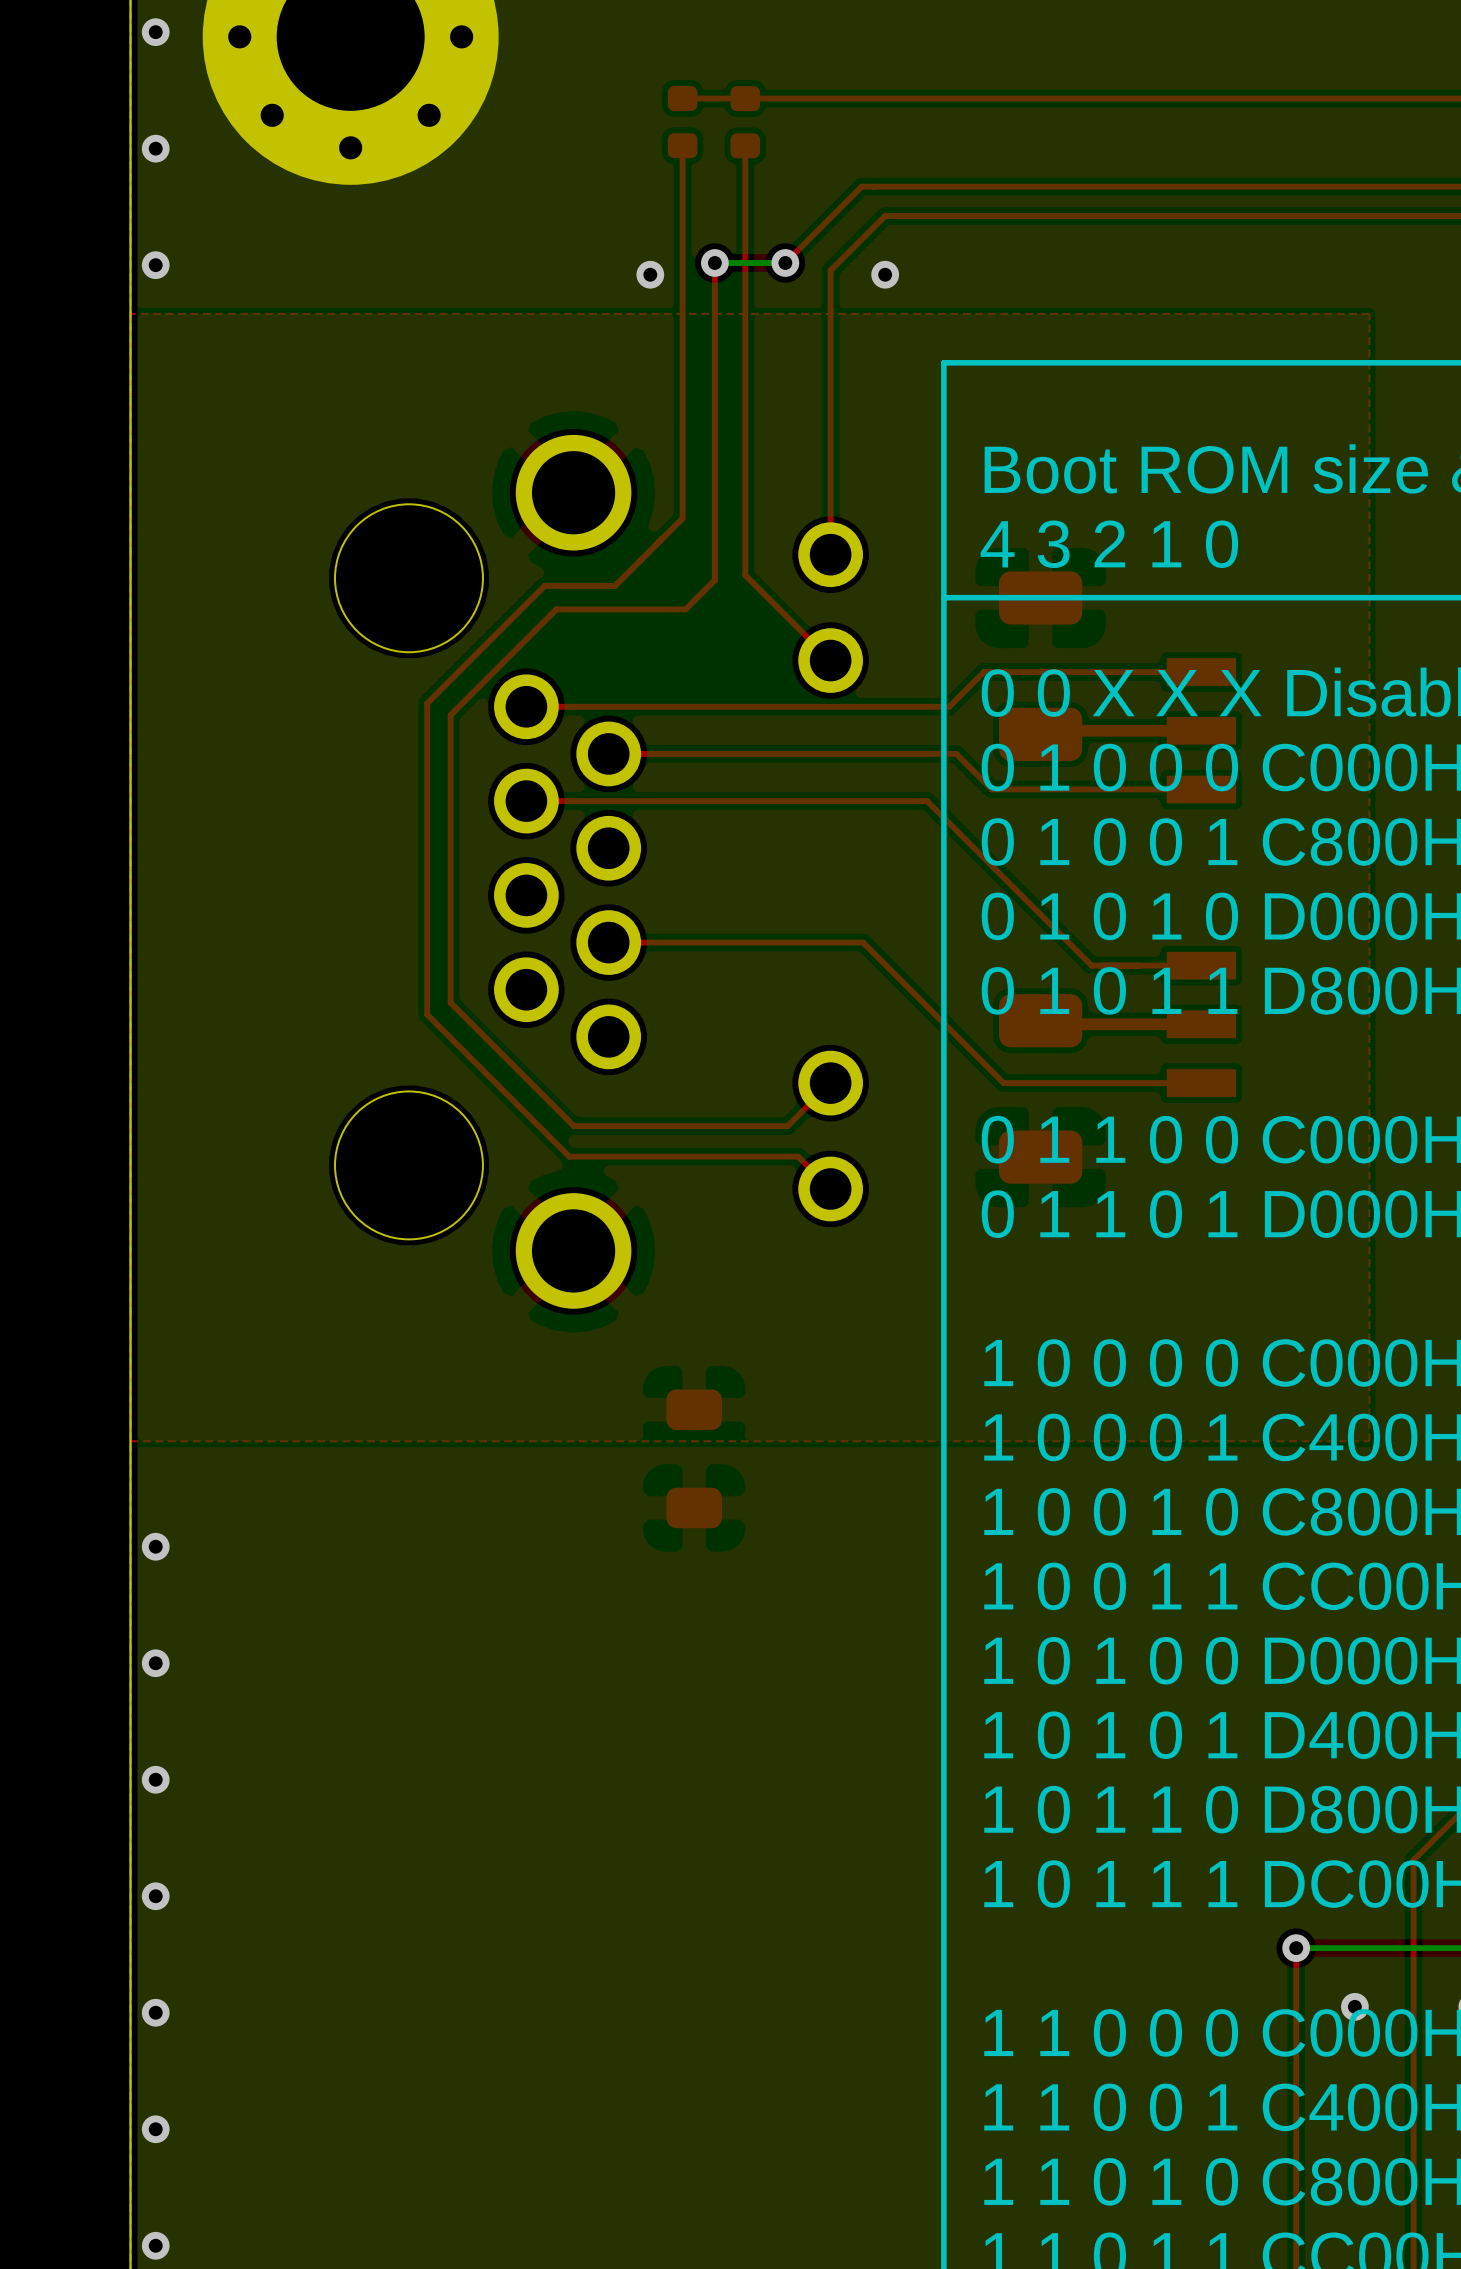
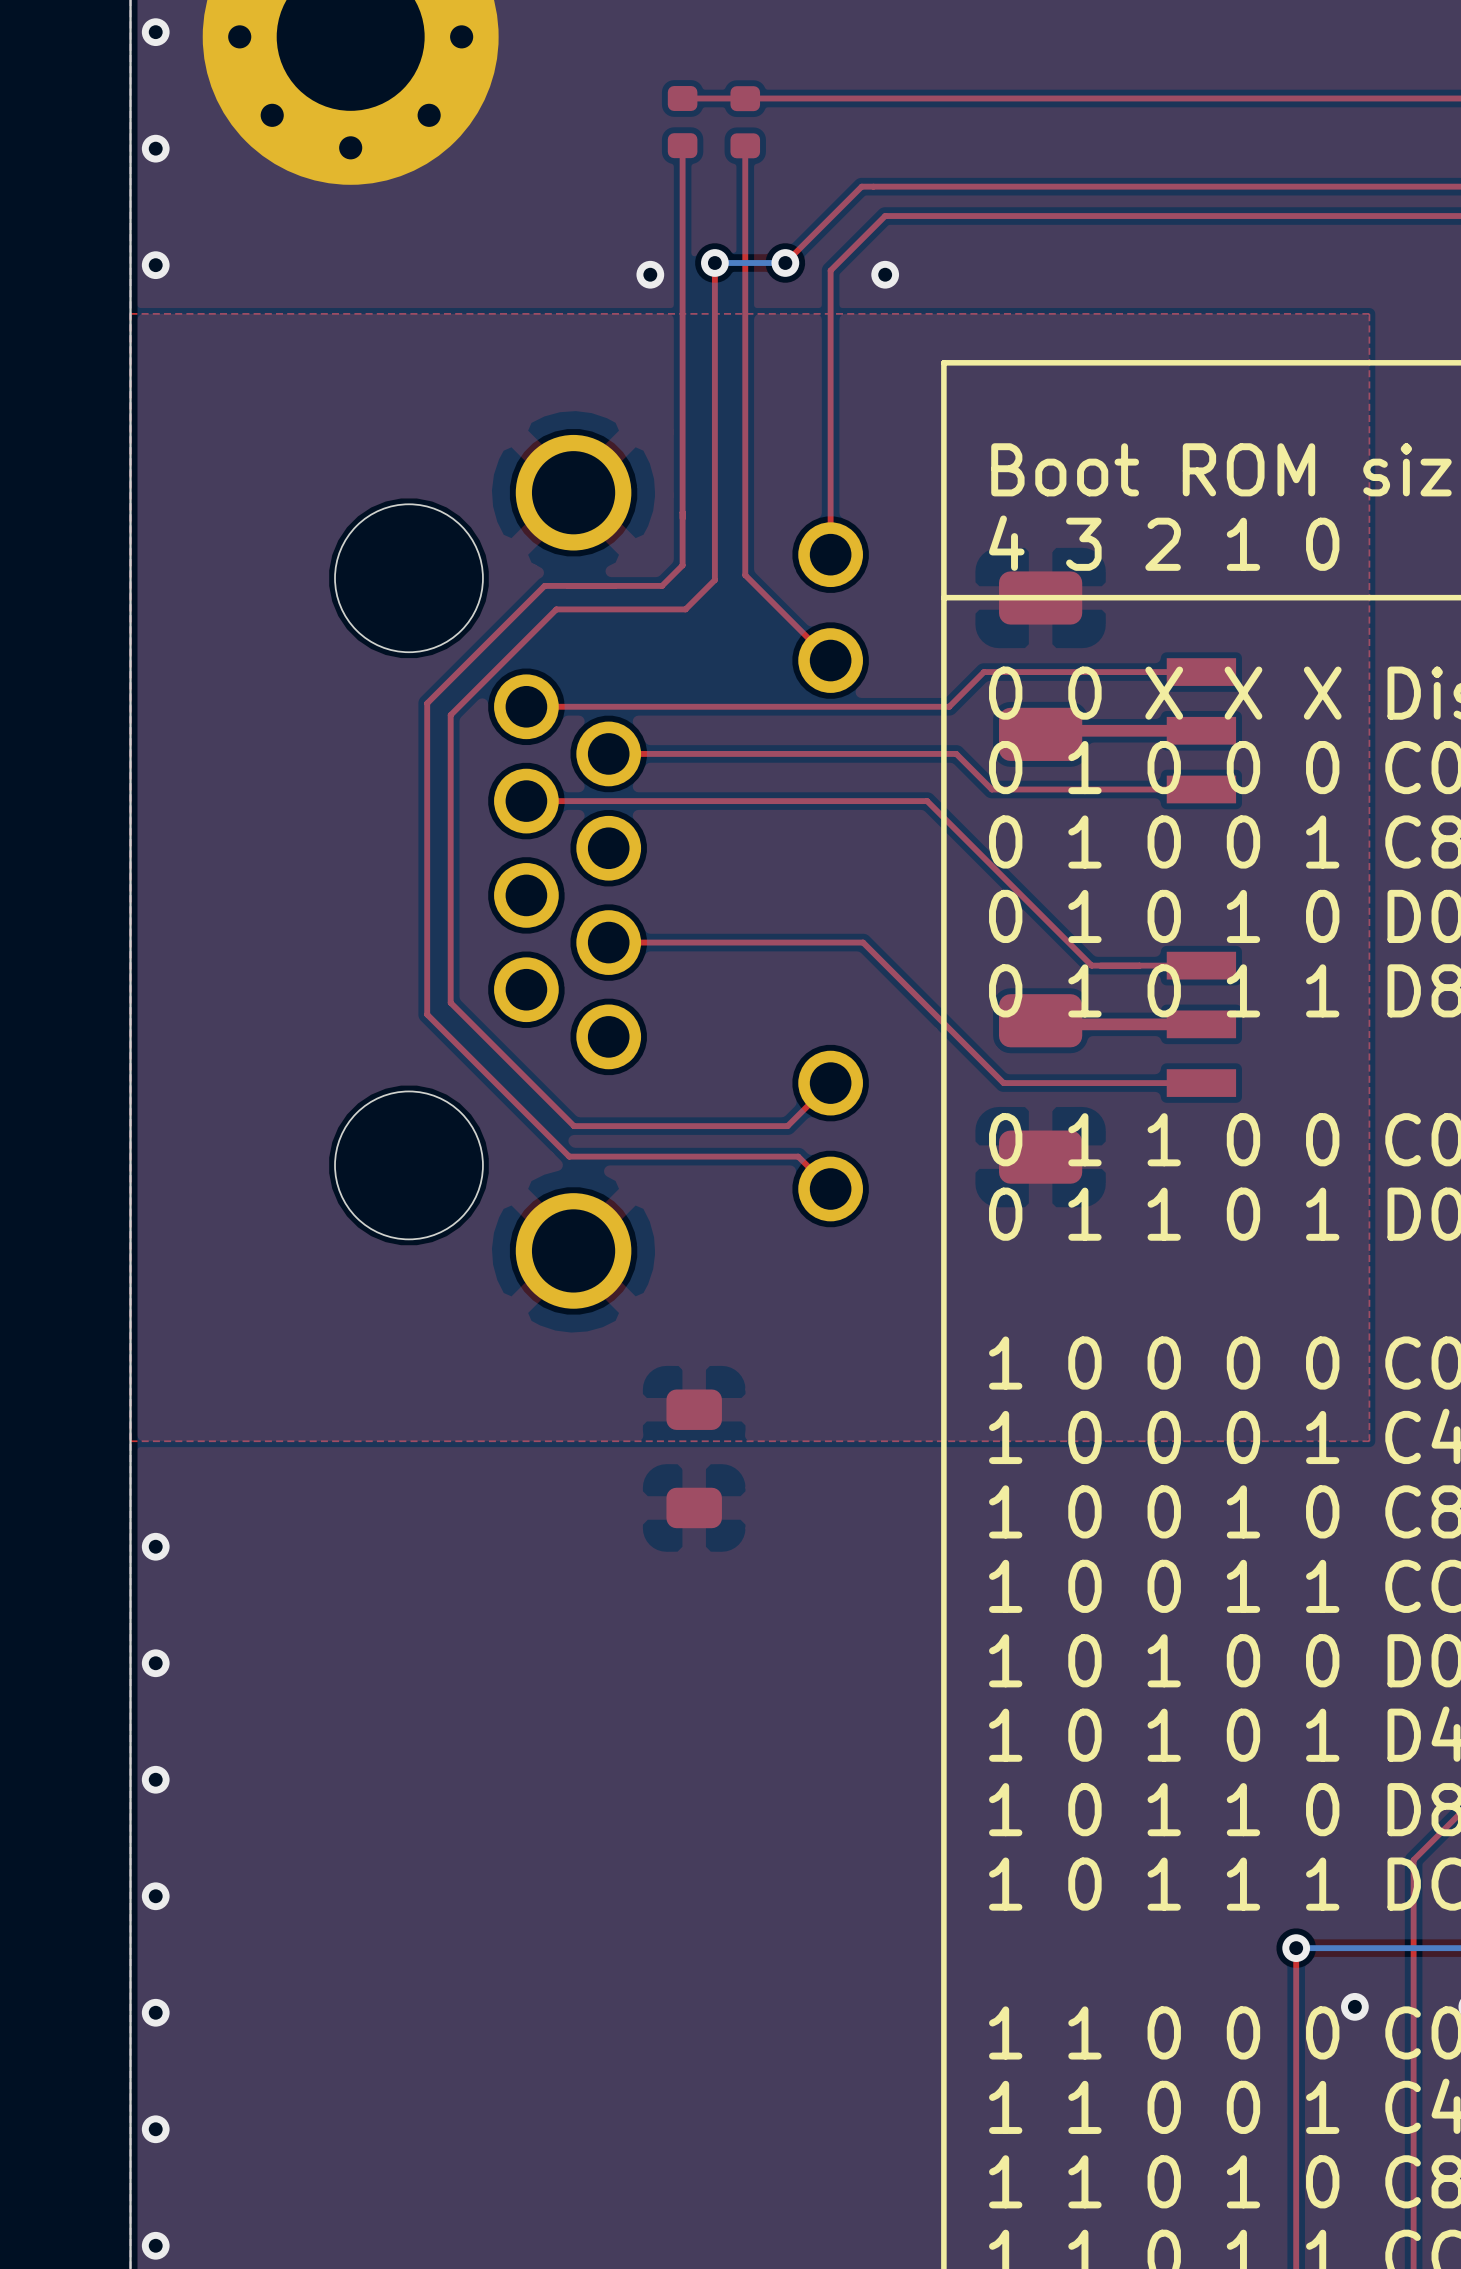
top track: (682, 518) (615, 585) -> (682, 518) (682, 565) (662, 585) (615, 585)

